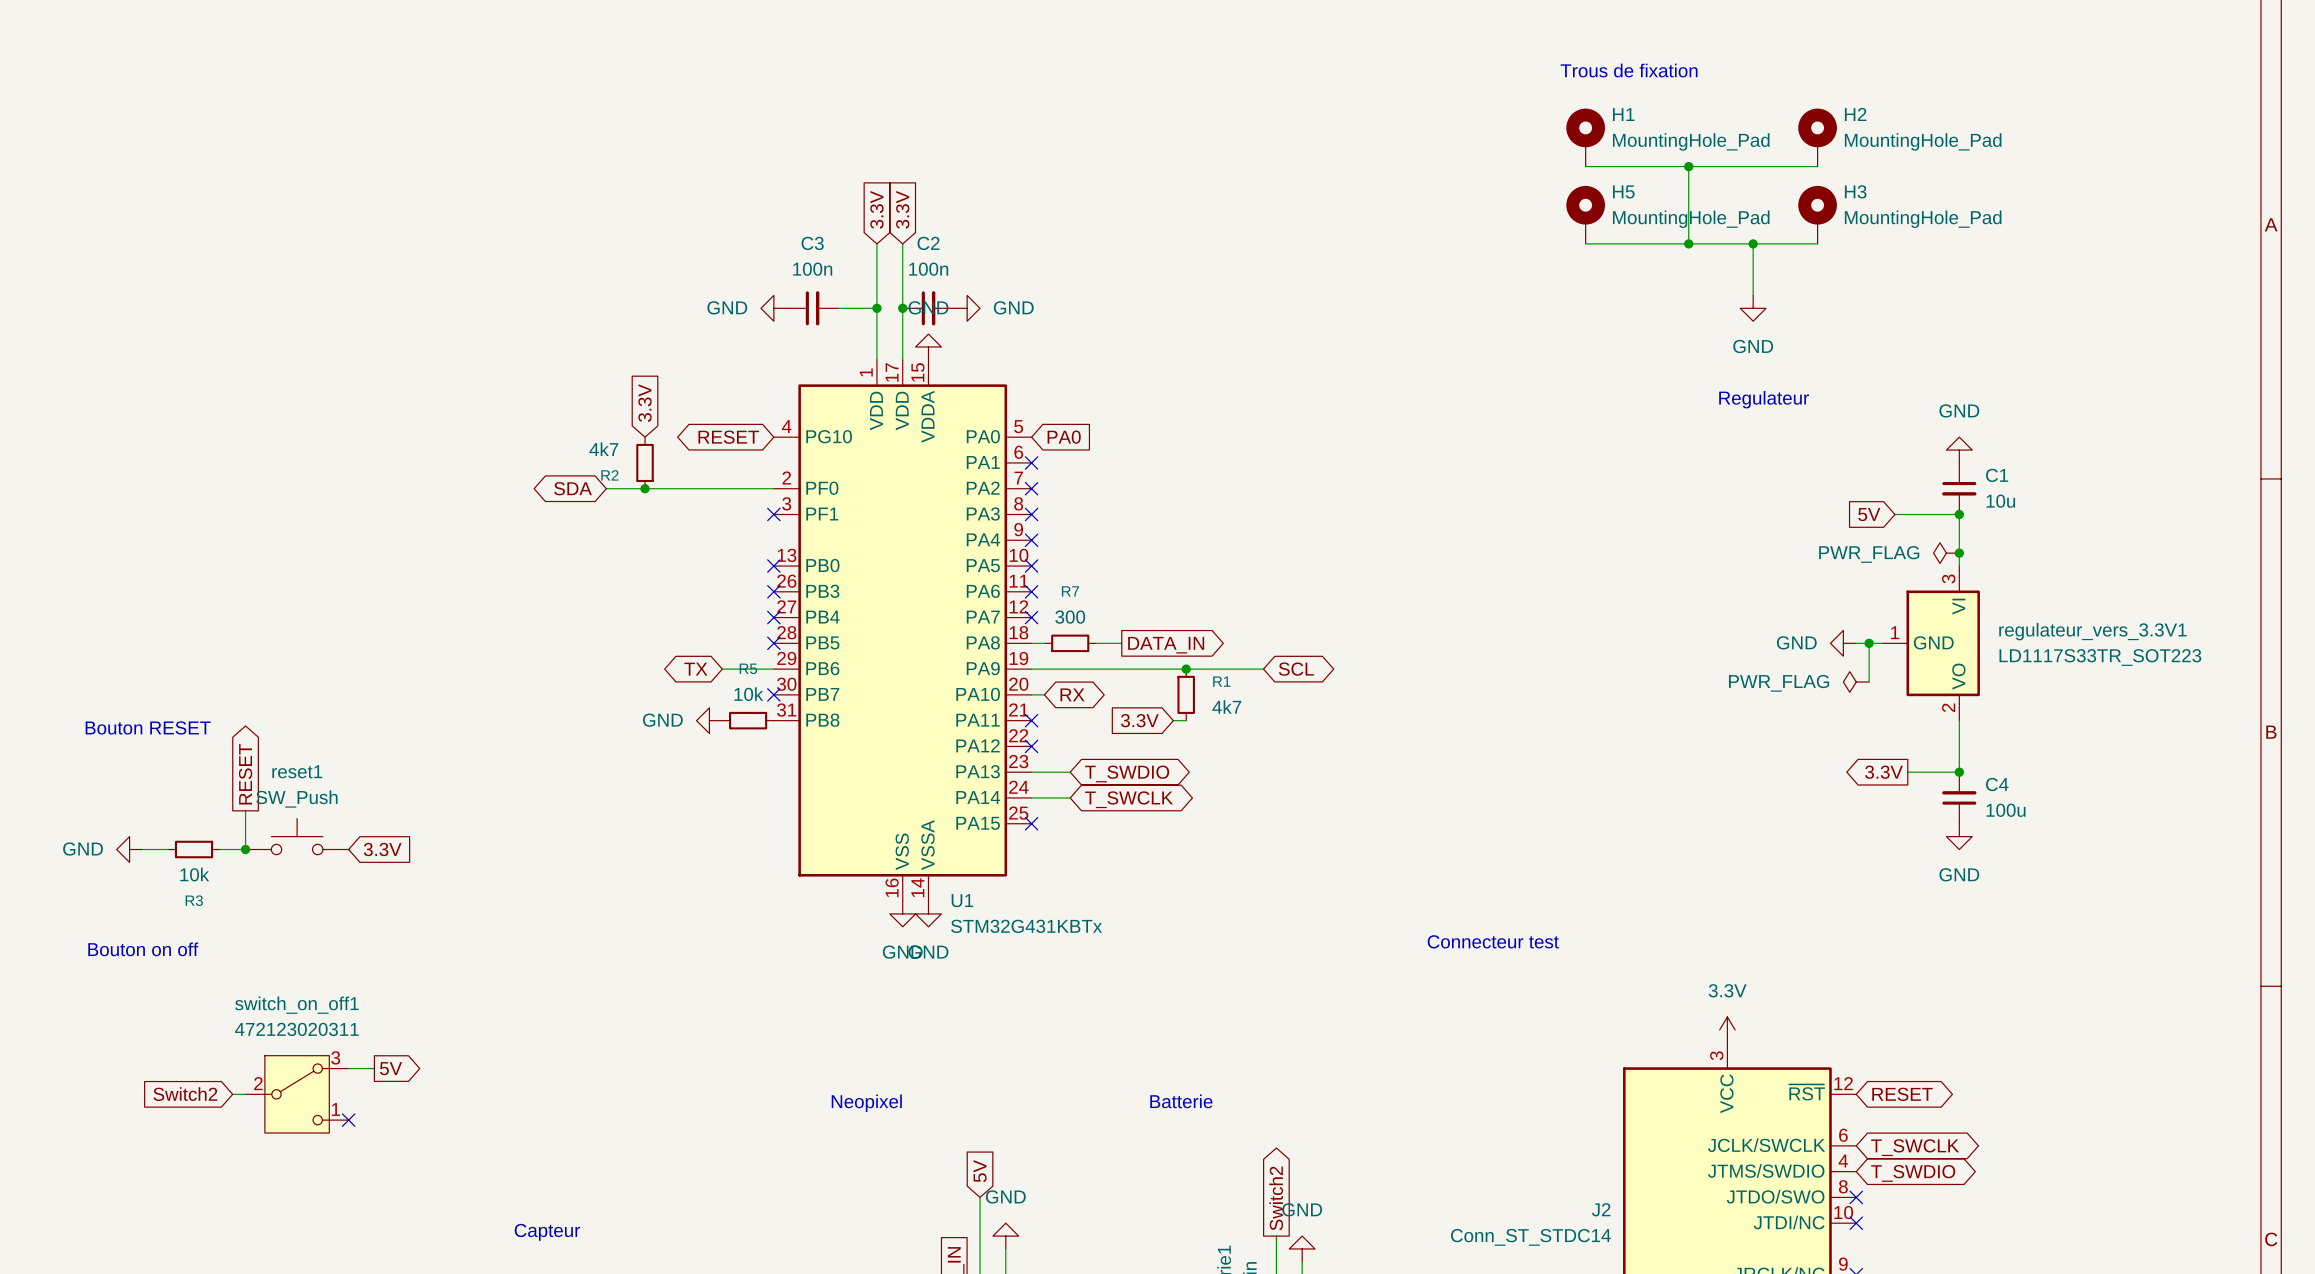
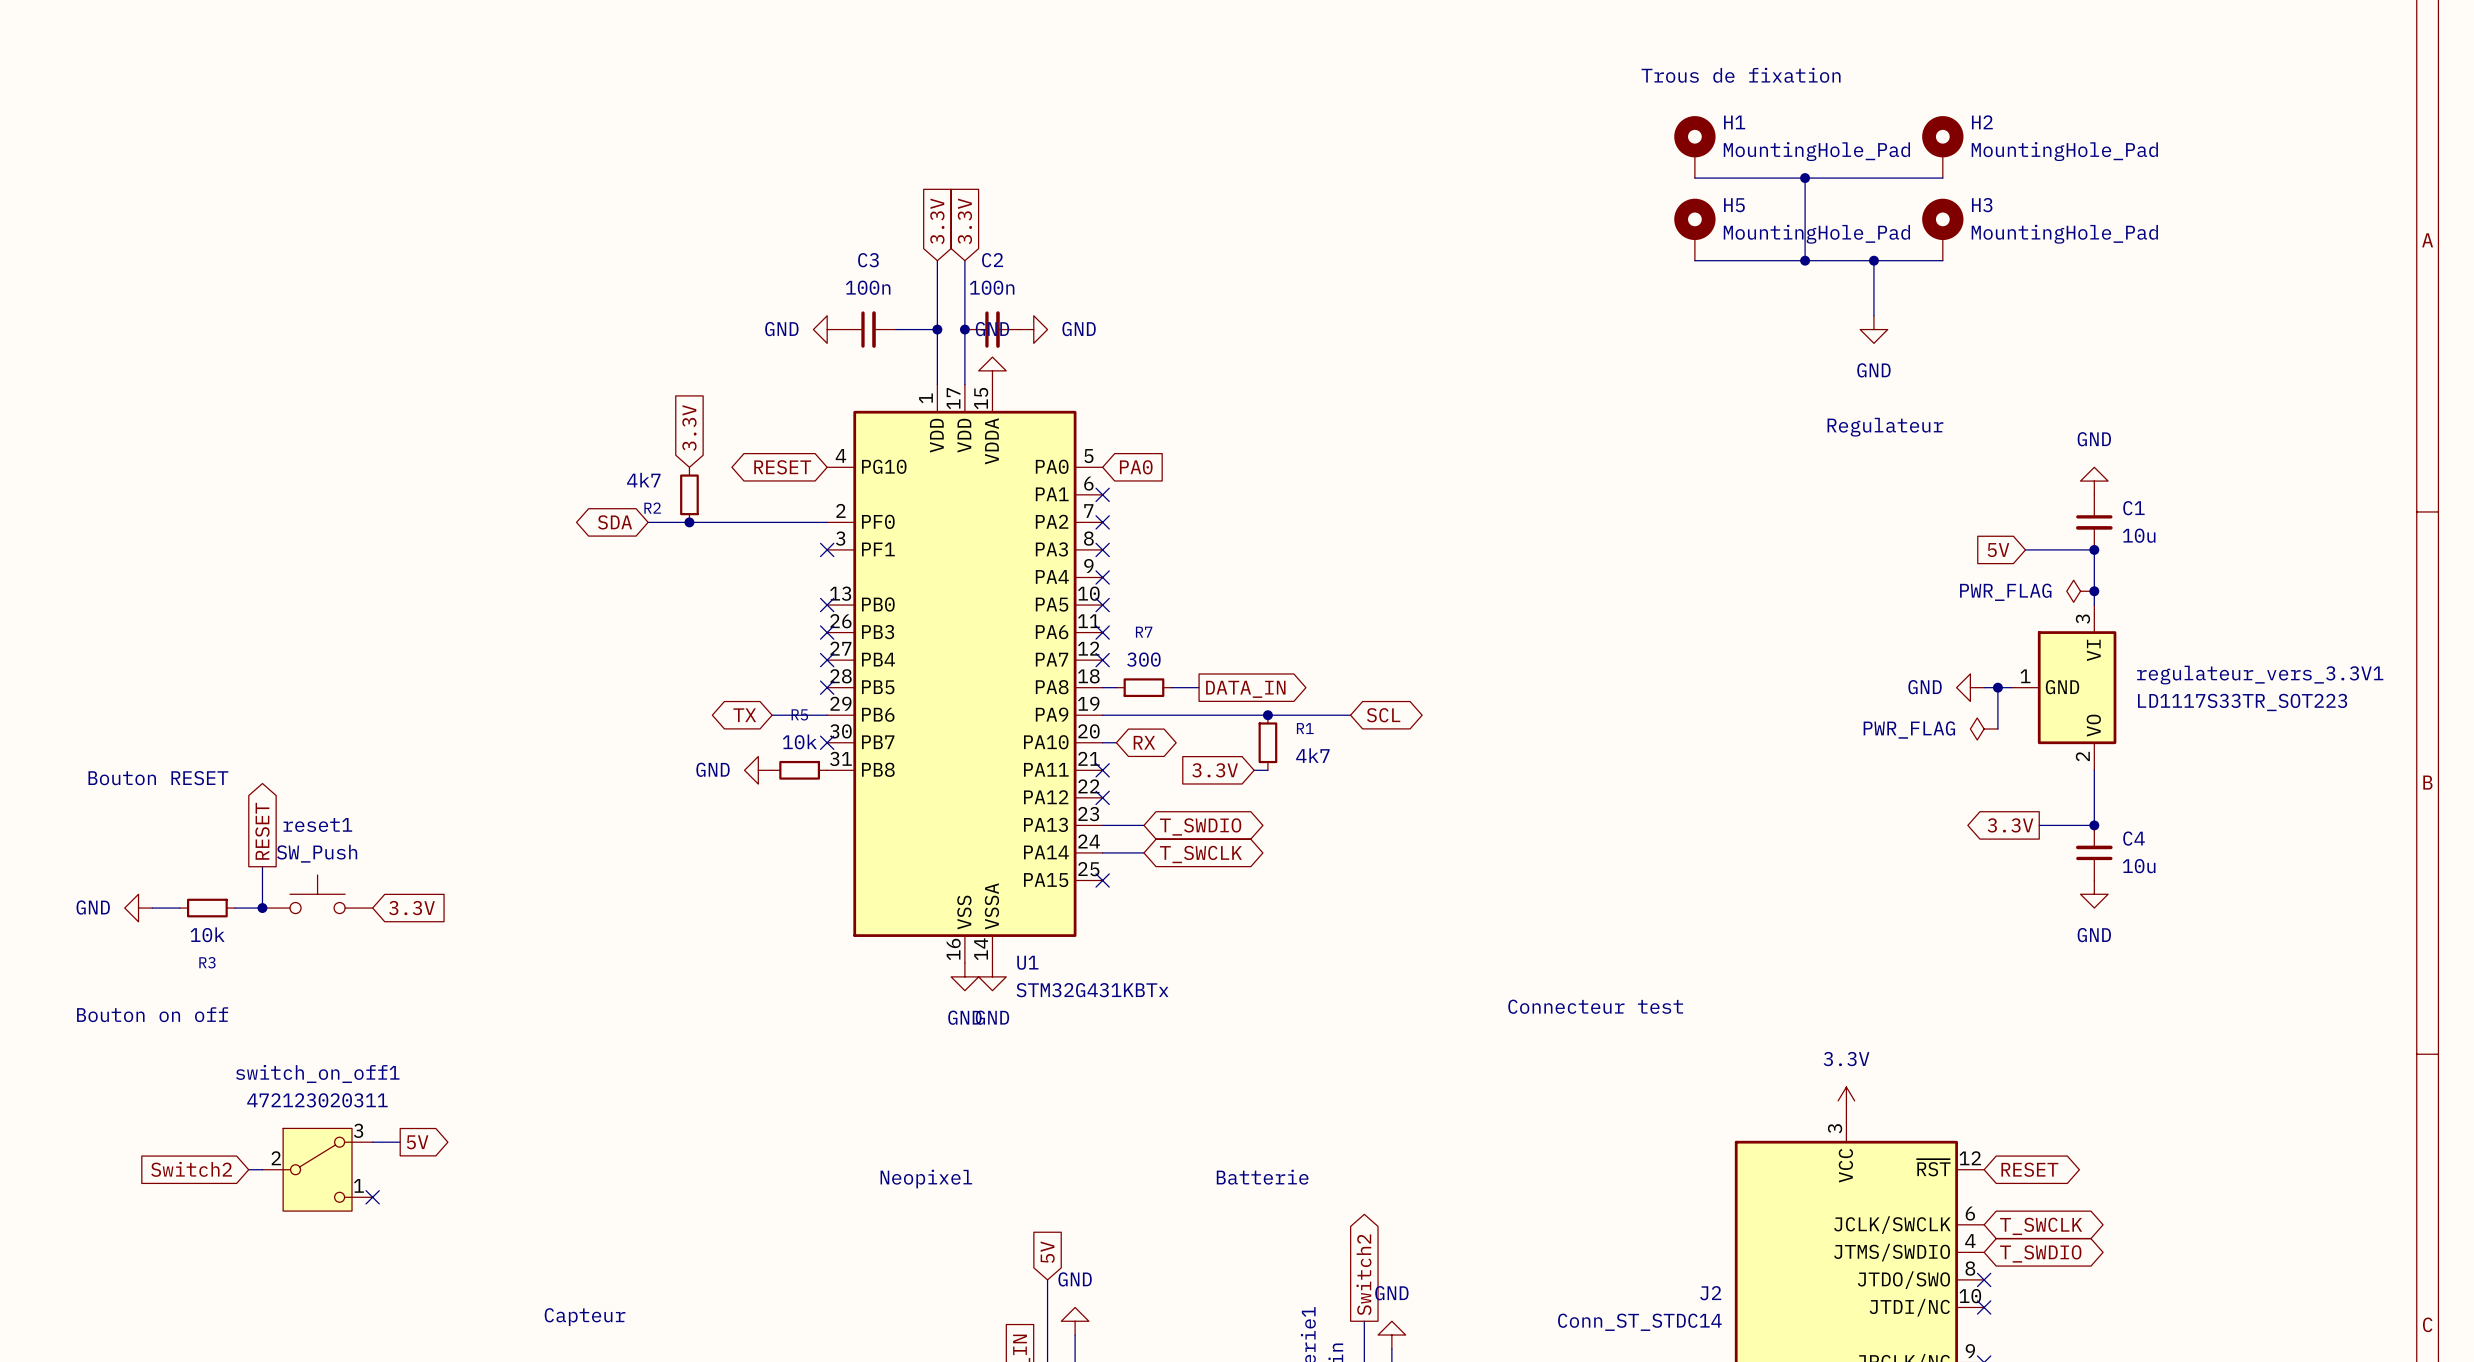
C4 value: 100u (2006, 810) -> 10u (2139, 866)

